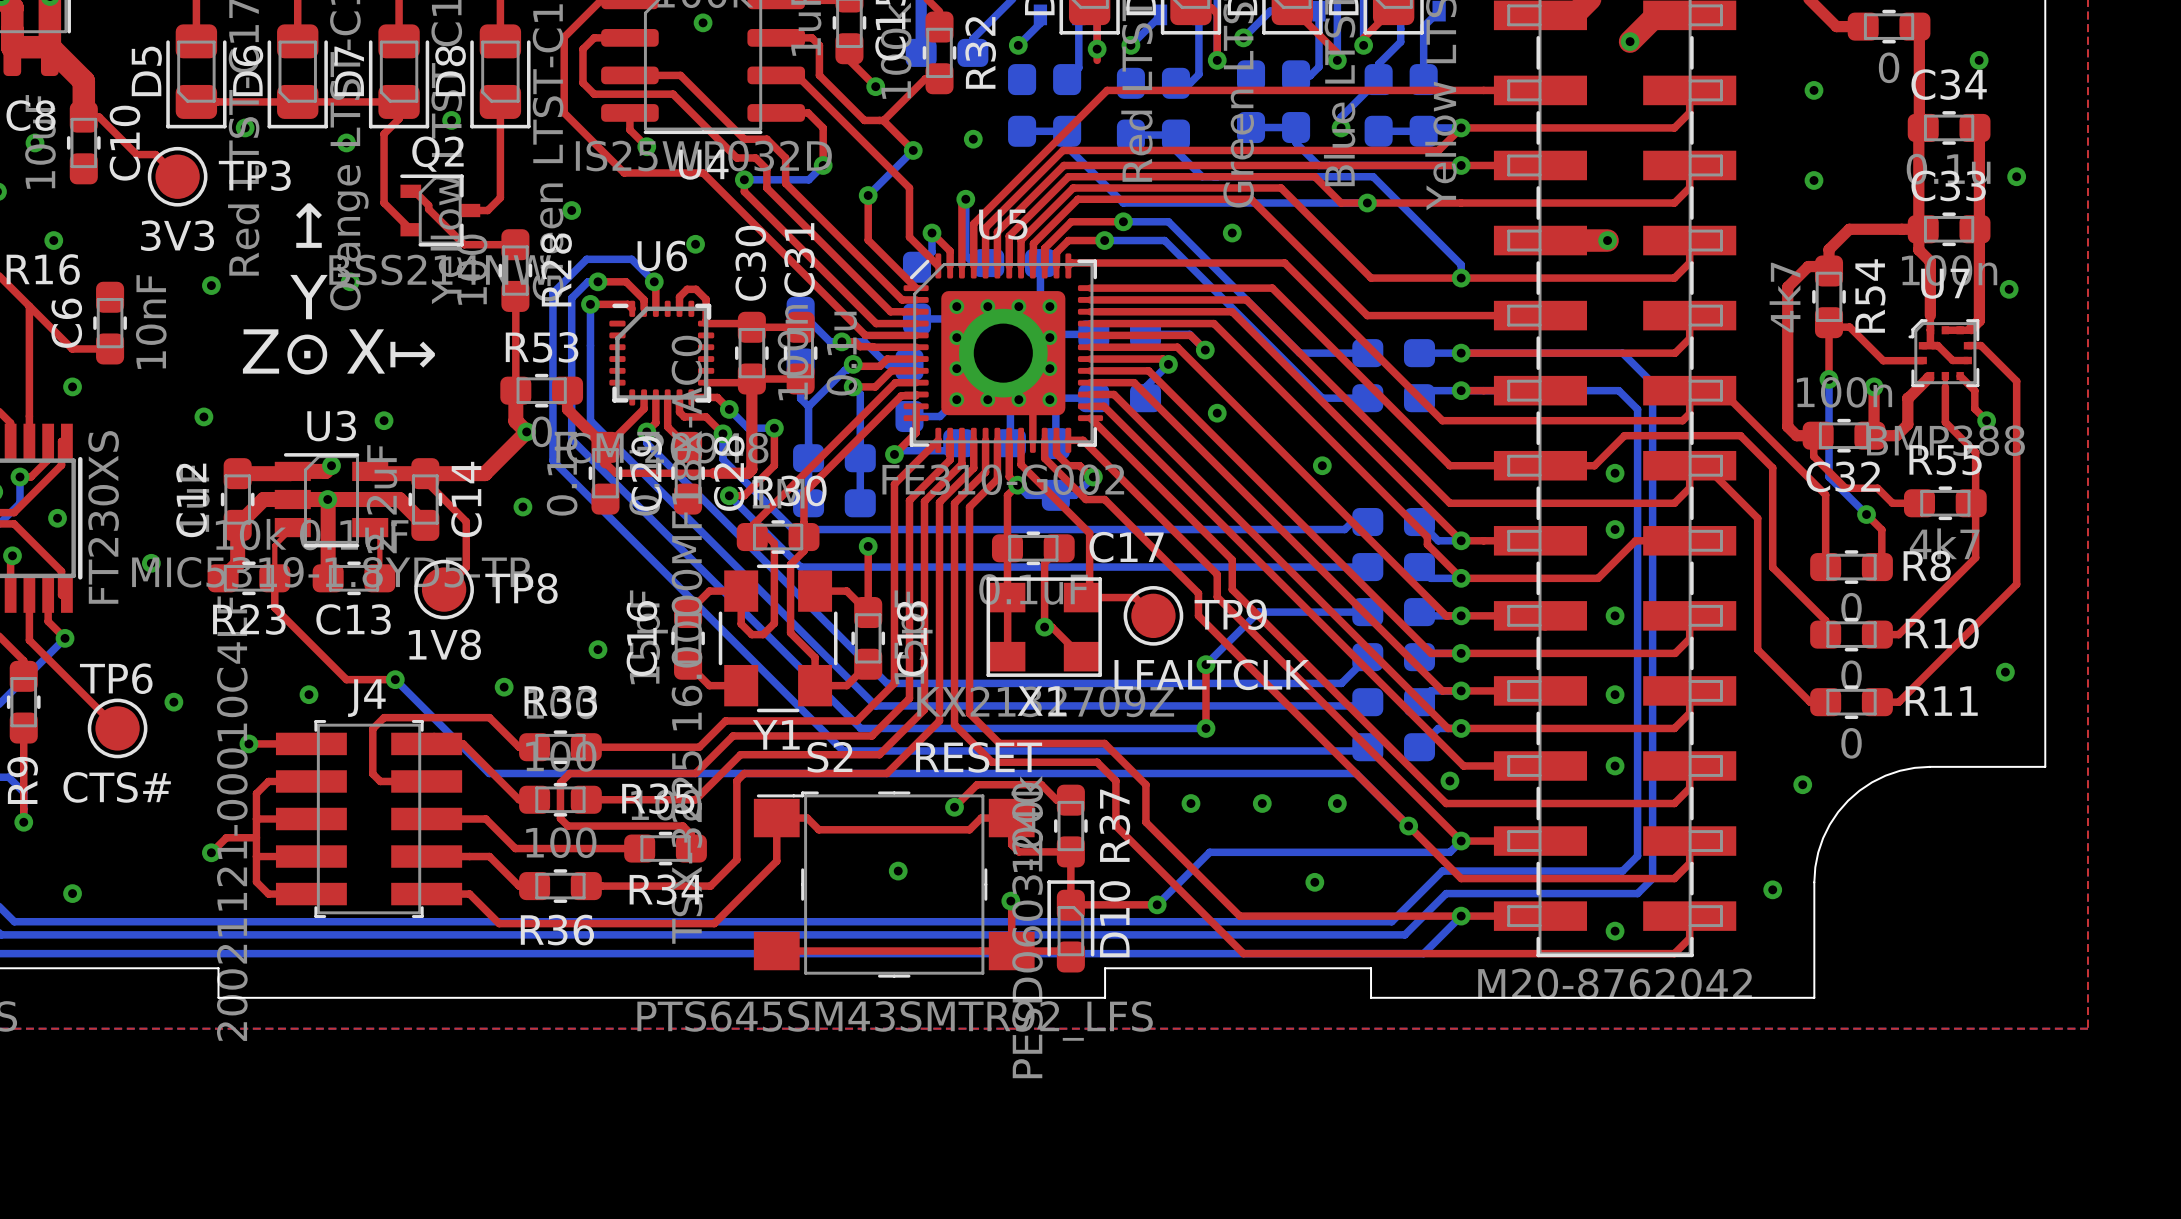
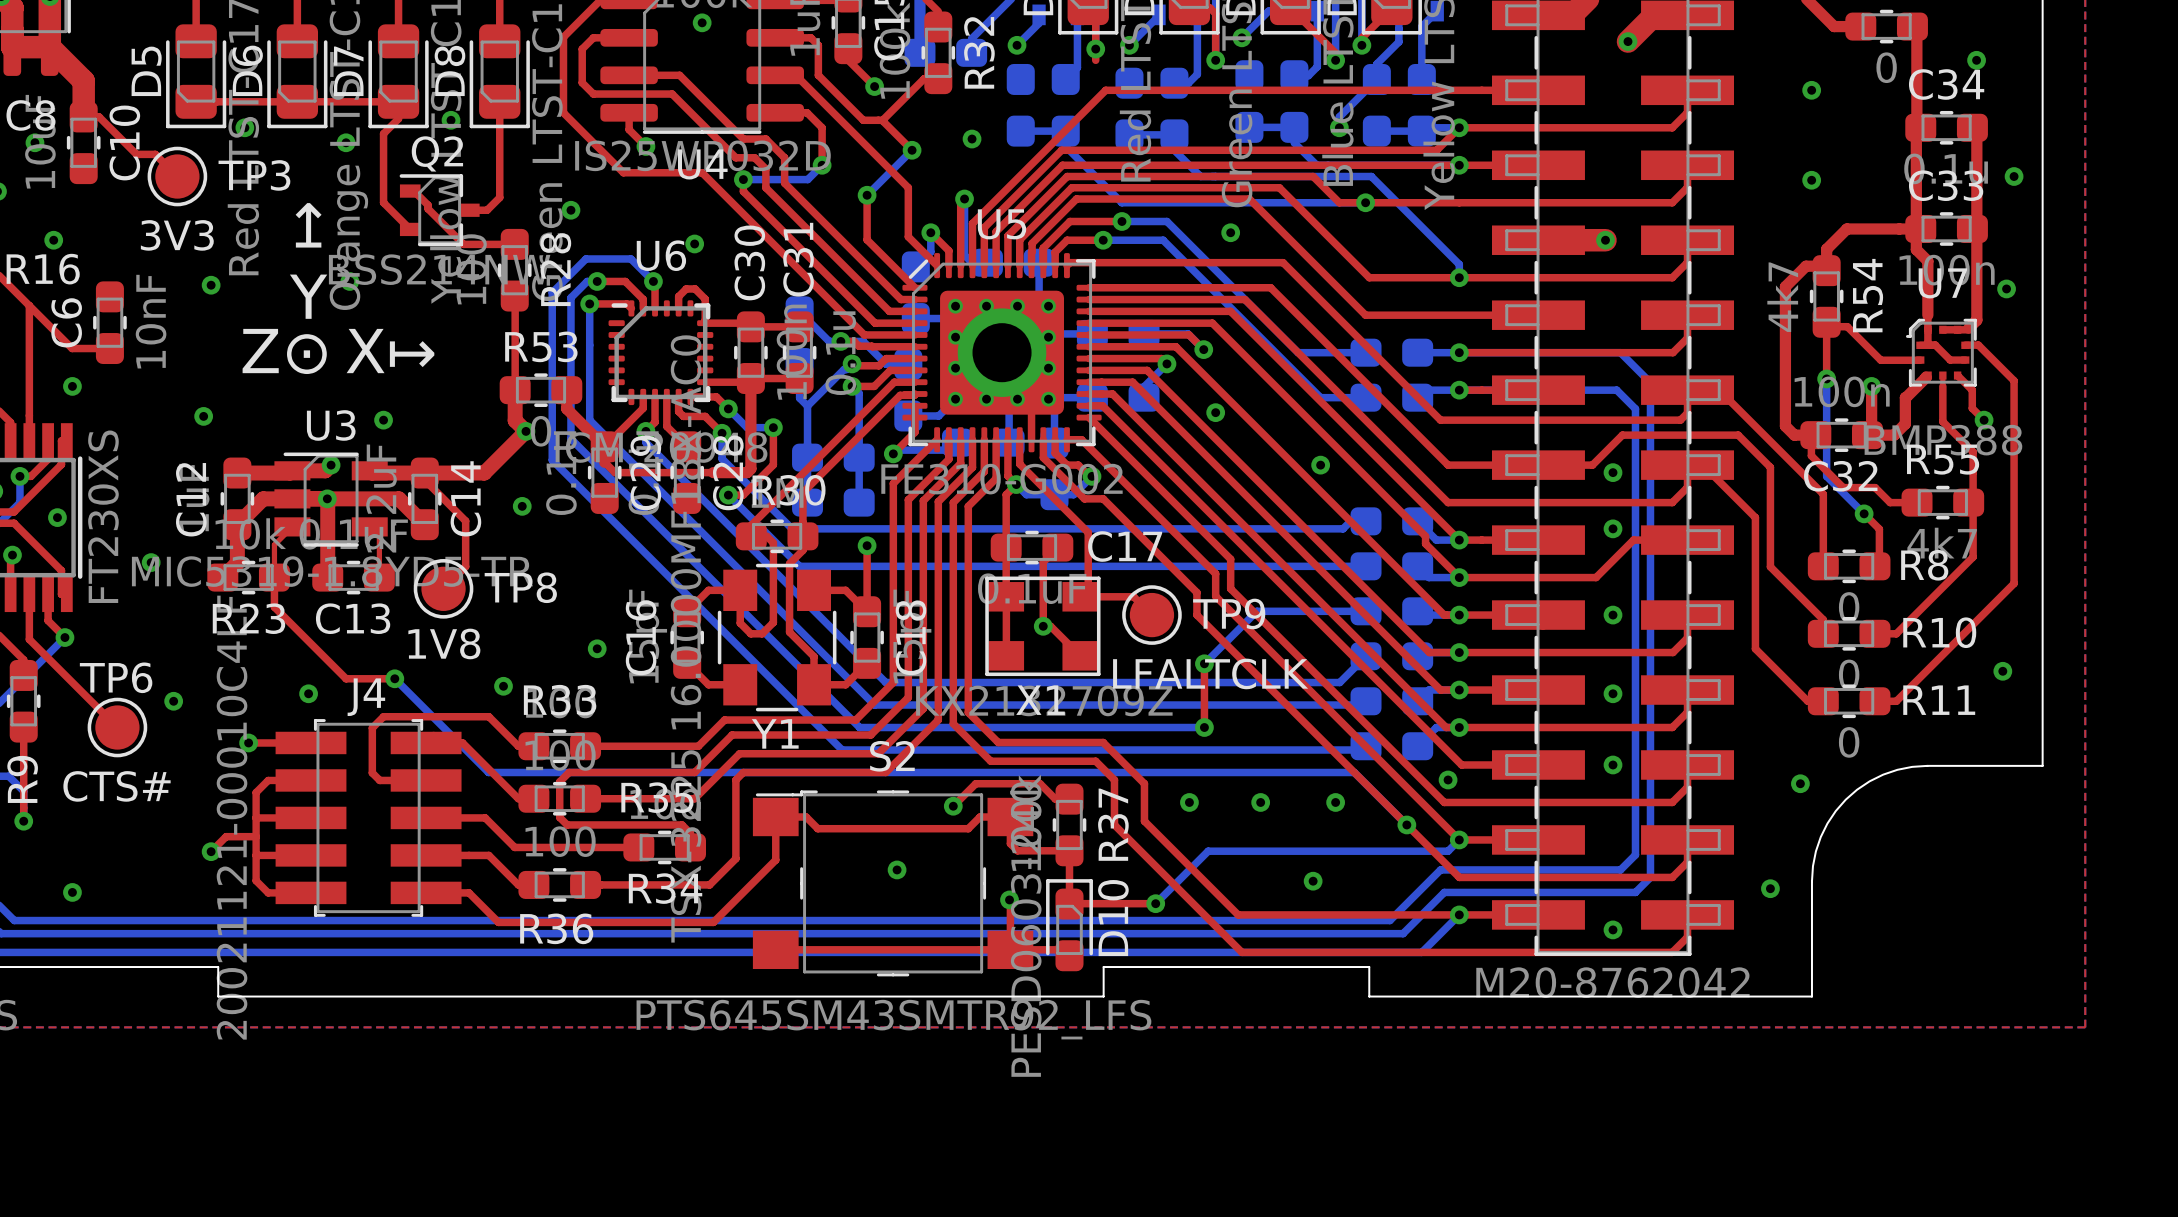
S2 name position: S2 (829, 757) -> S2 (892, 756)
S2 text: RESET (979, 757) -> none

